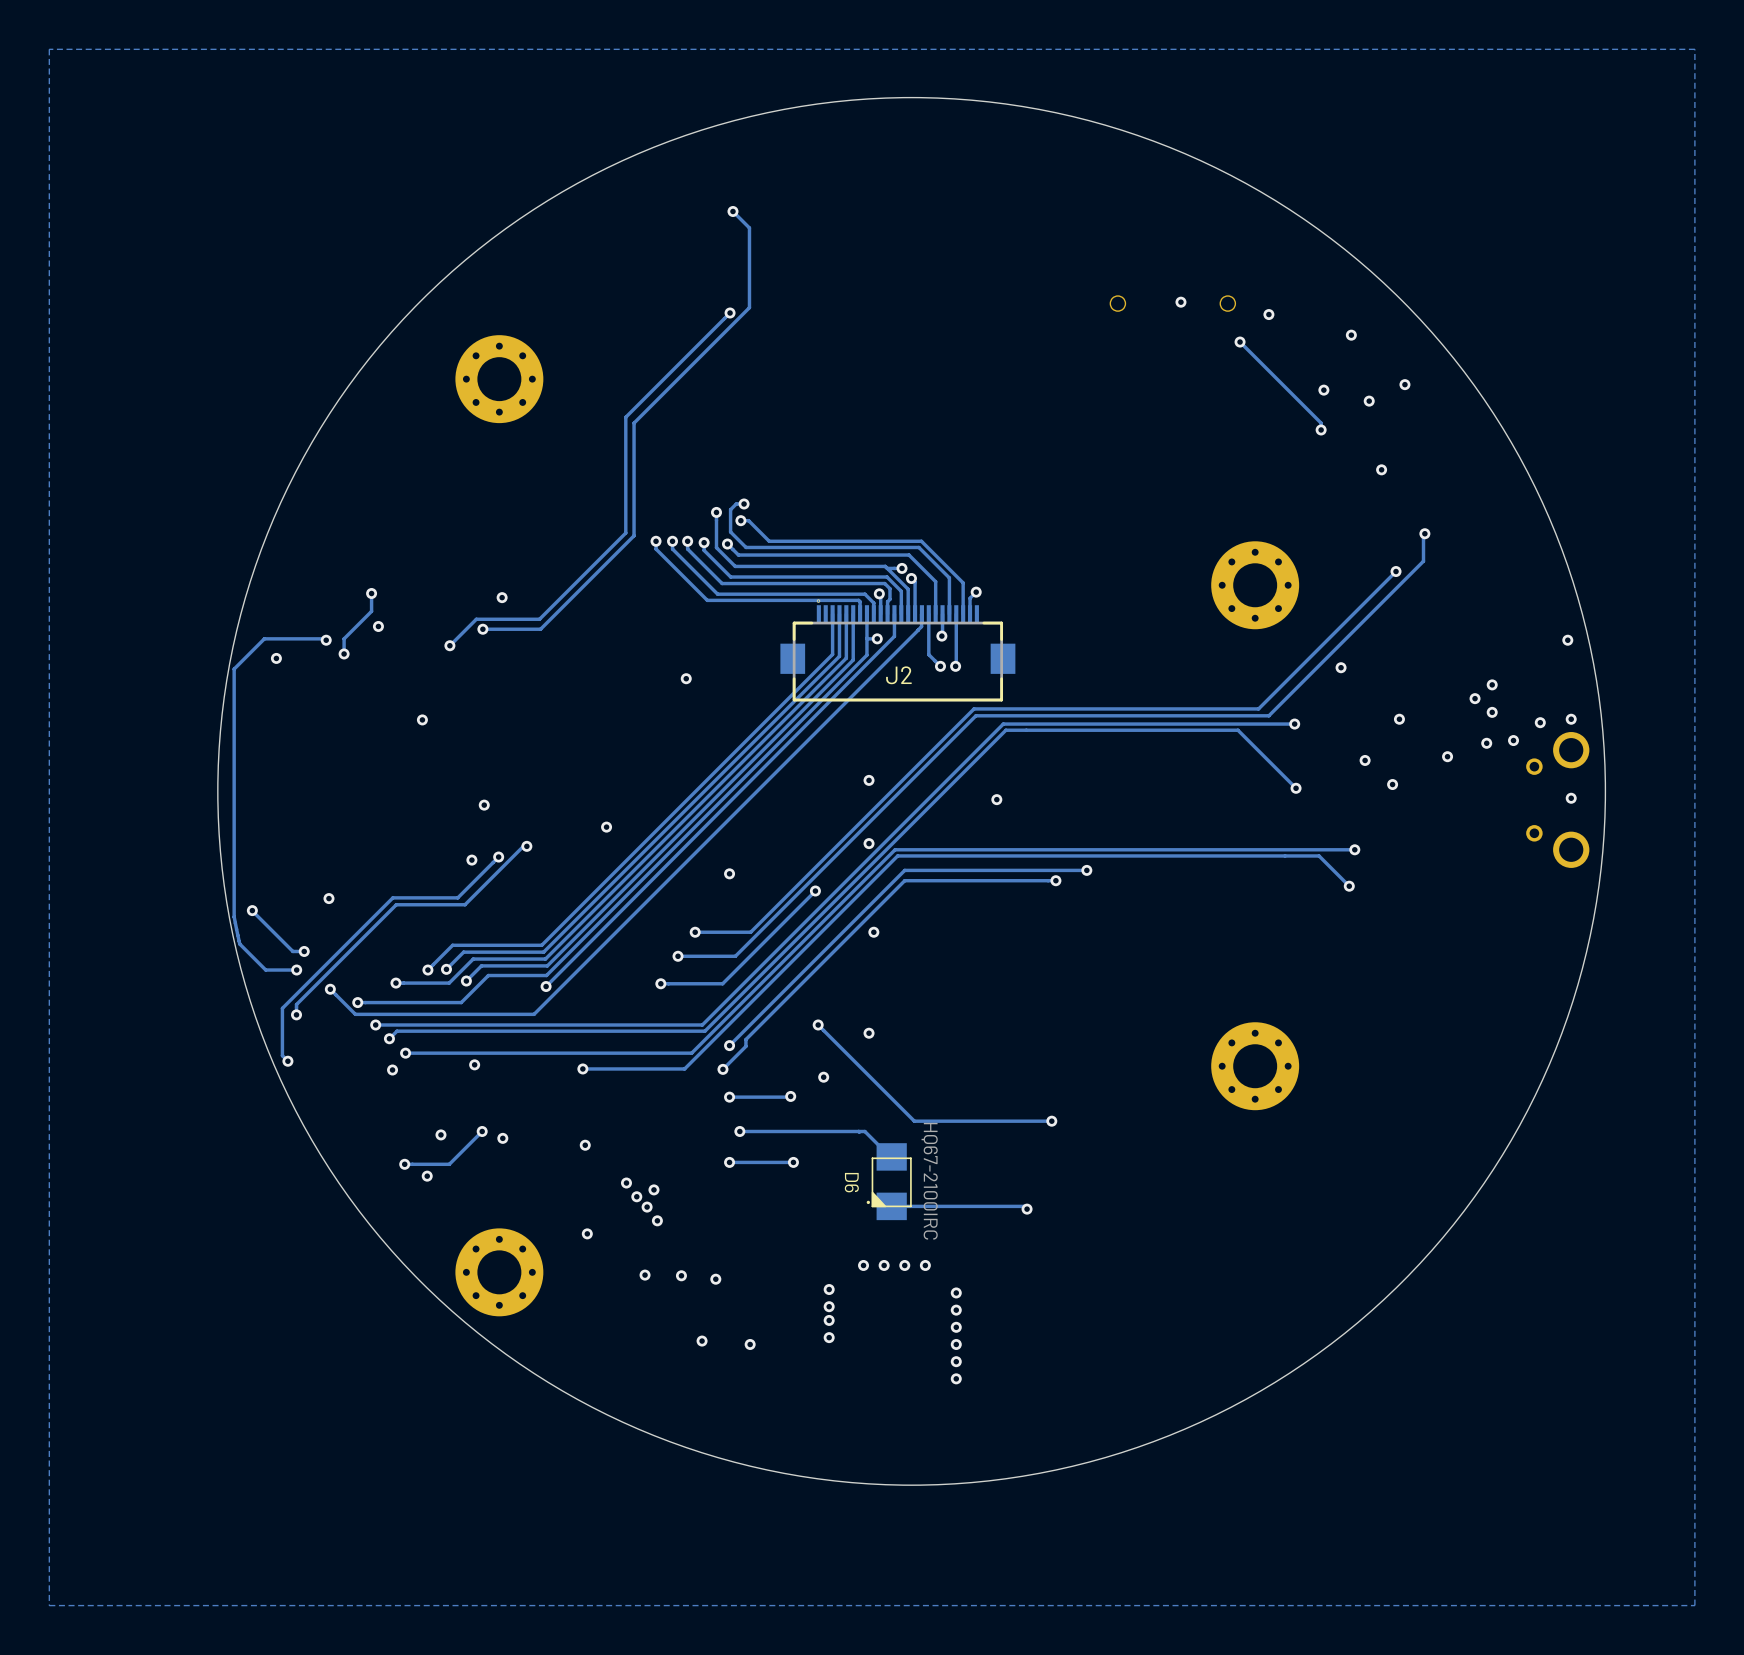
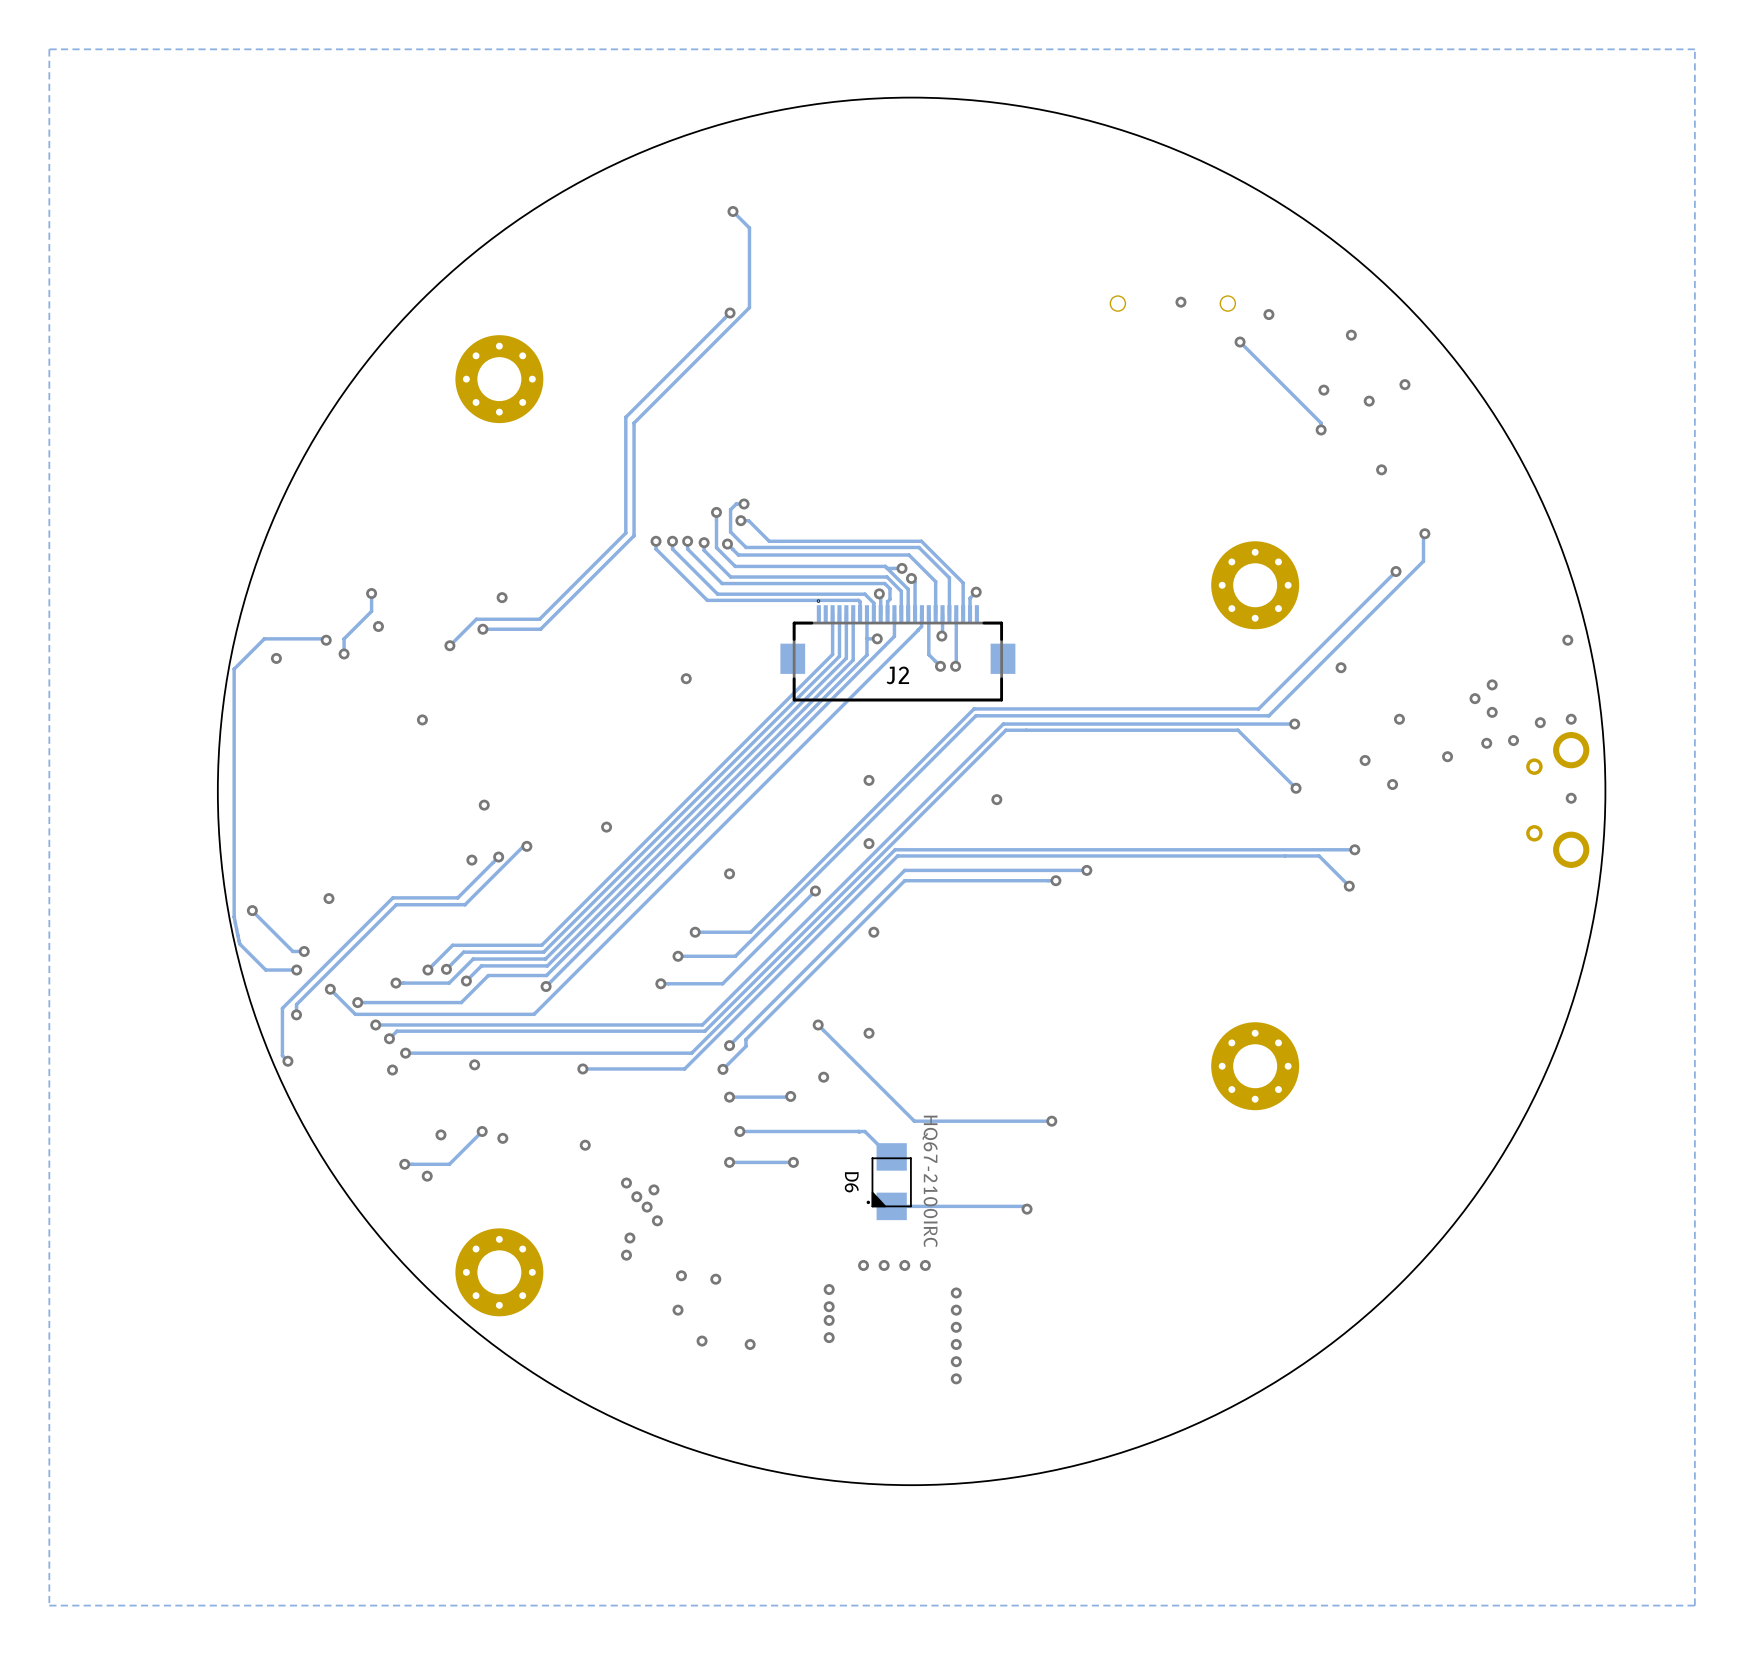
via: (587, 1233) -> none
via: none -> (629, 1237)
via: none -> (626, 1255)
via: (645, 1275) -> none
via: none -> (678, 1310)

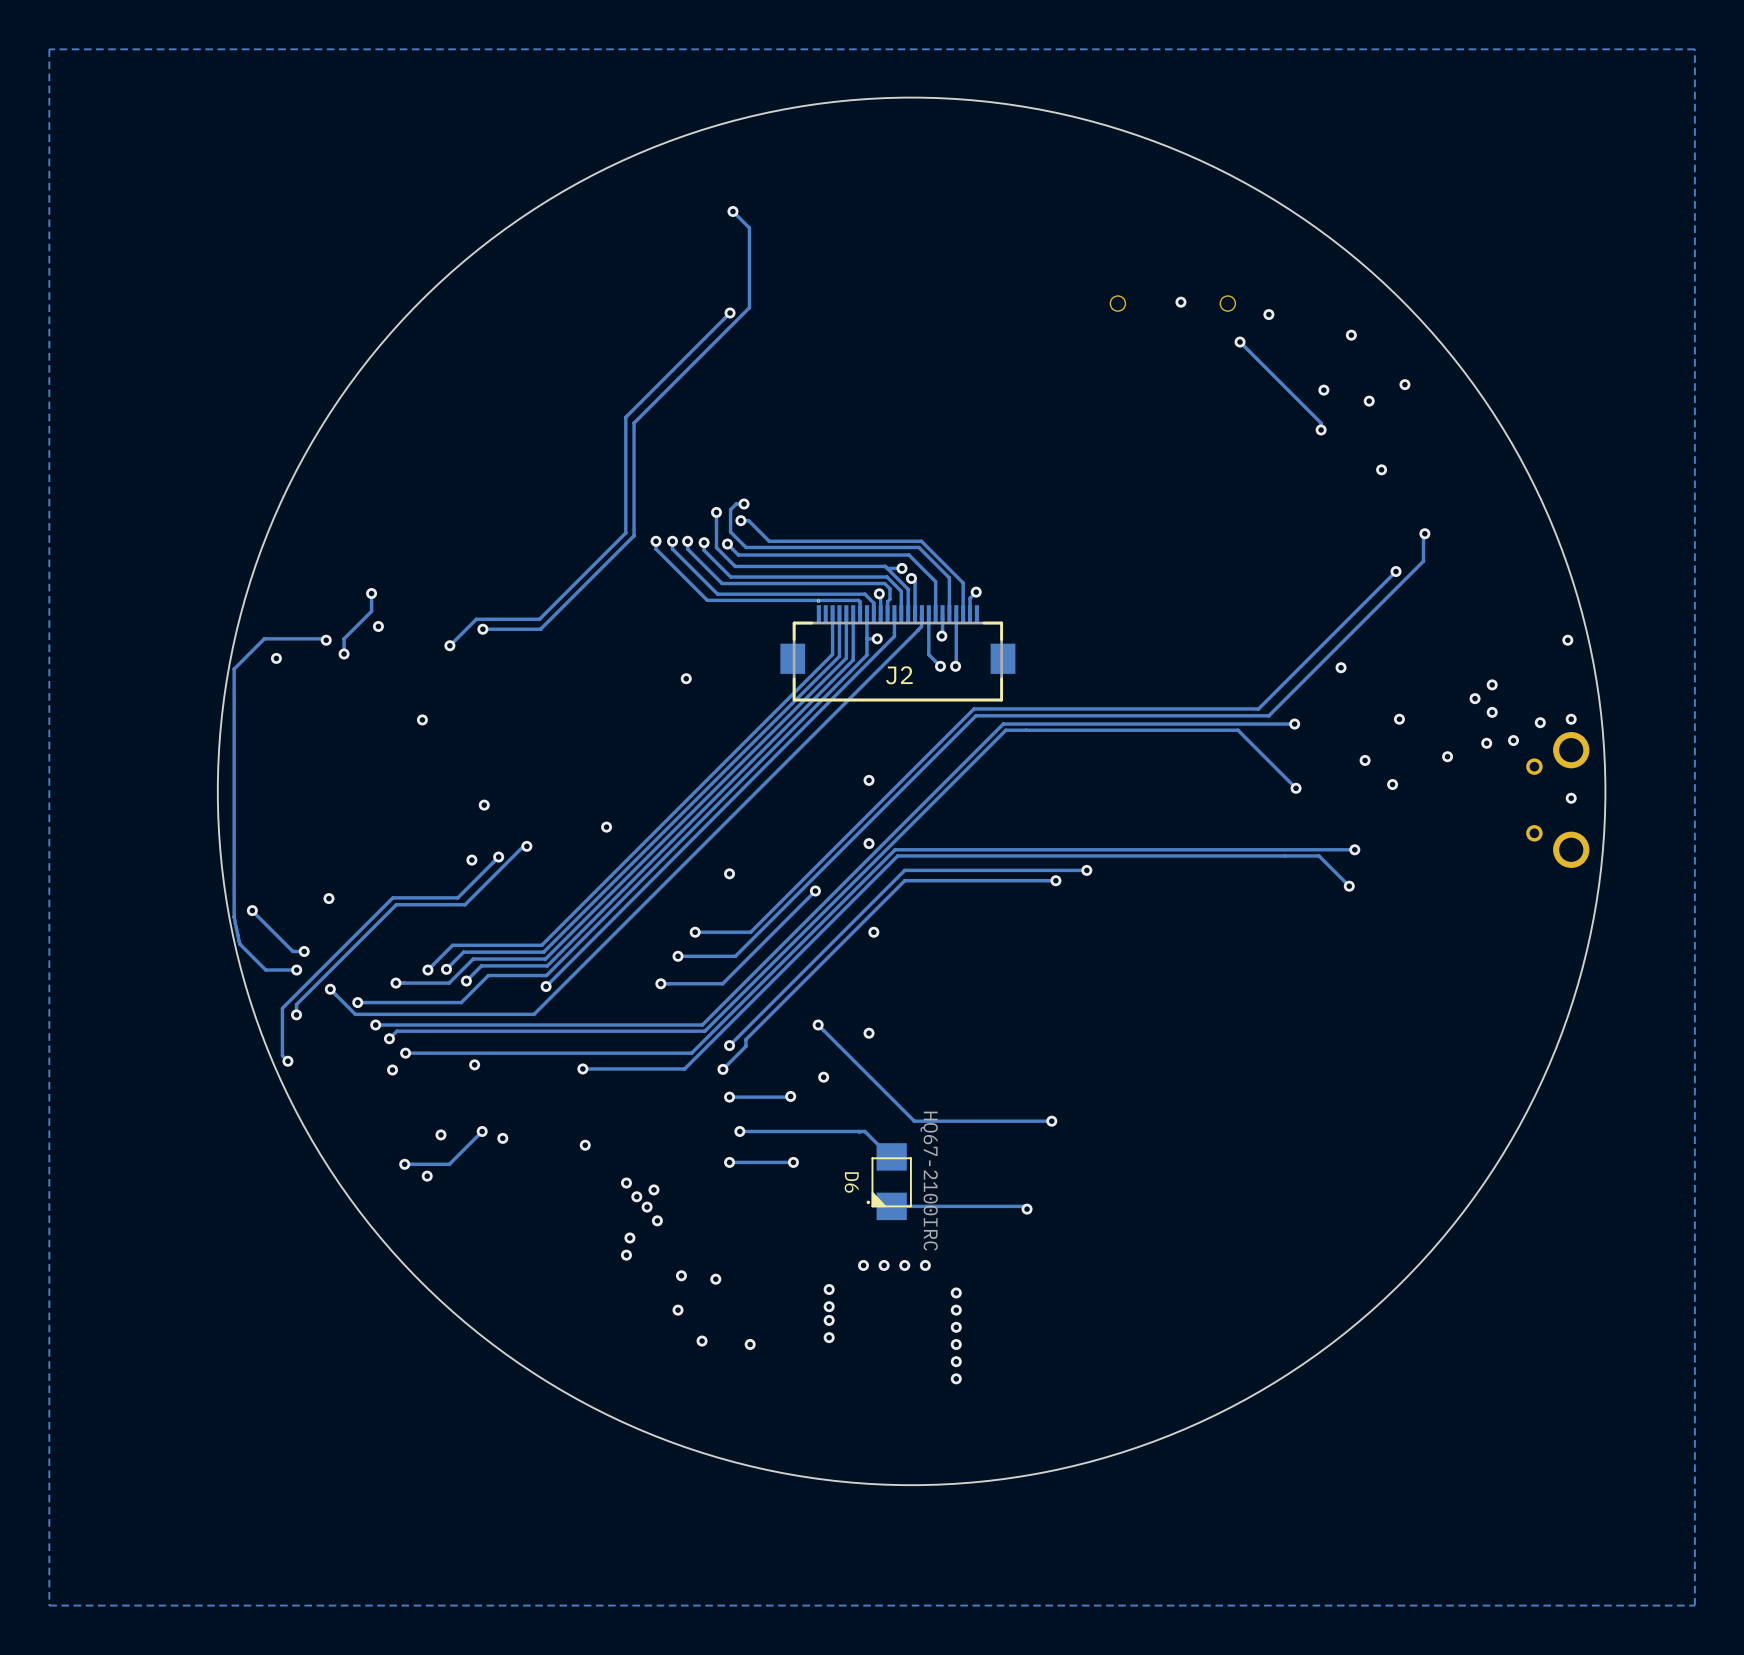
part: (499, 379) -> none
part: (1255, 585) -> none
via: (502, 597) -> none
via: (996, 799) -> none
part: (1255, 1066) -> none
part: (499, 1272) -> none

